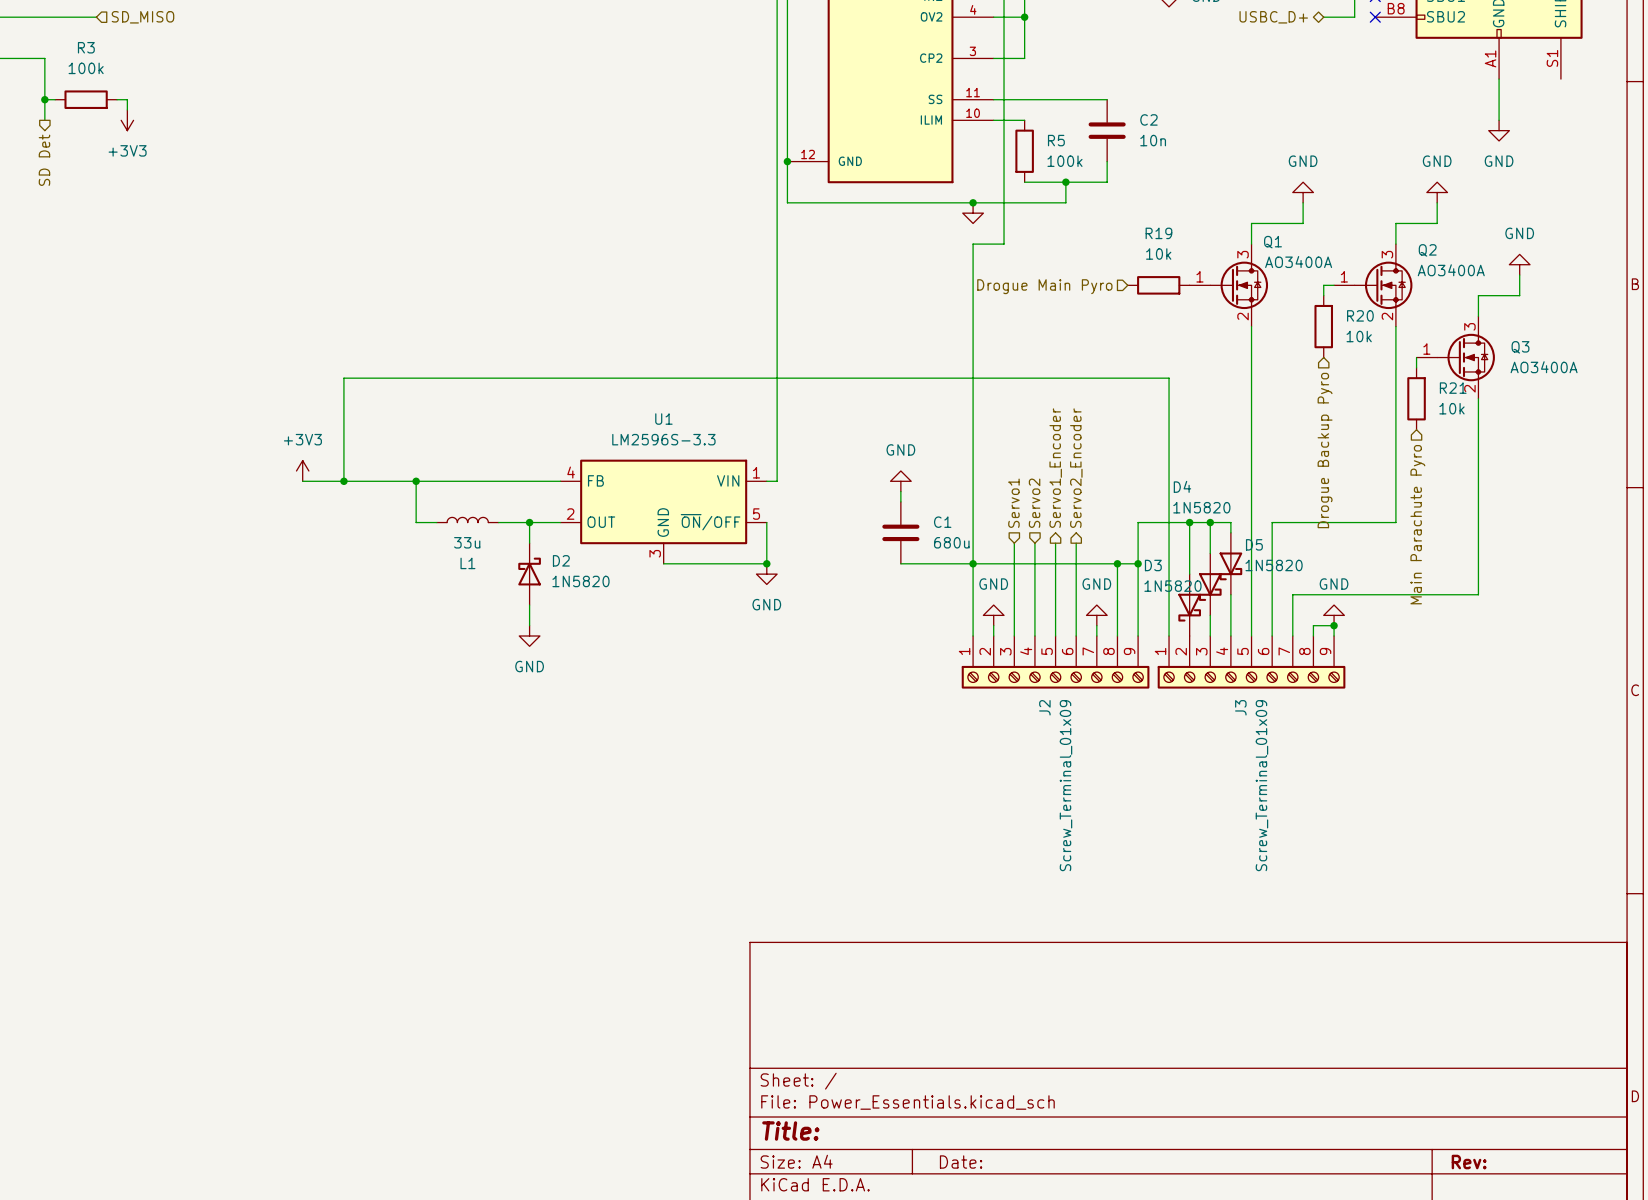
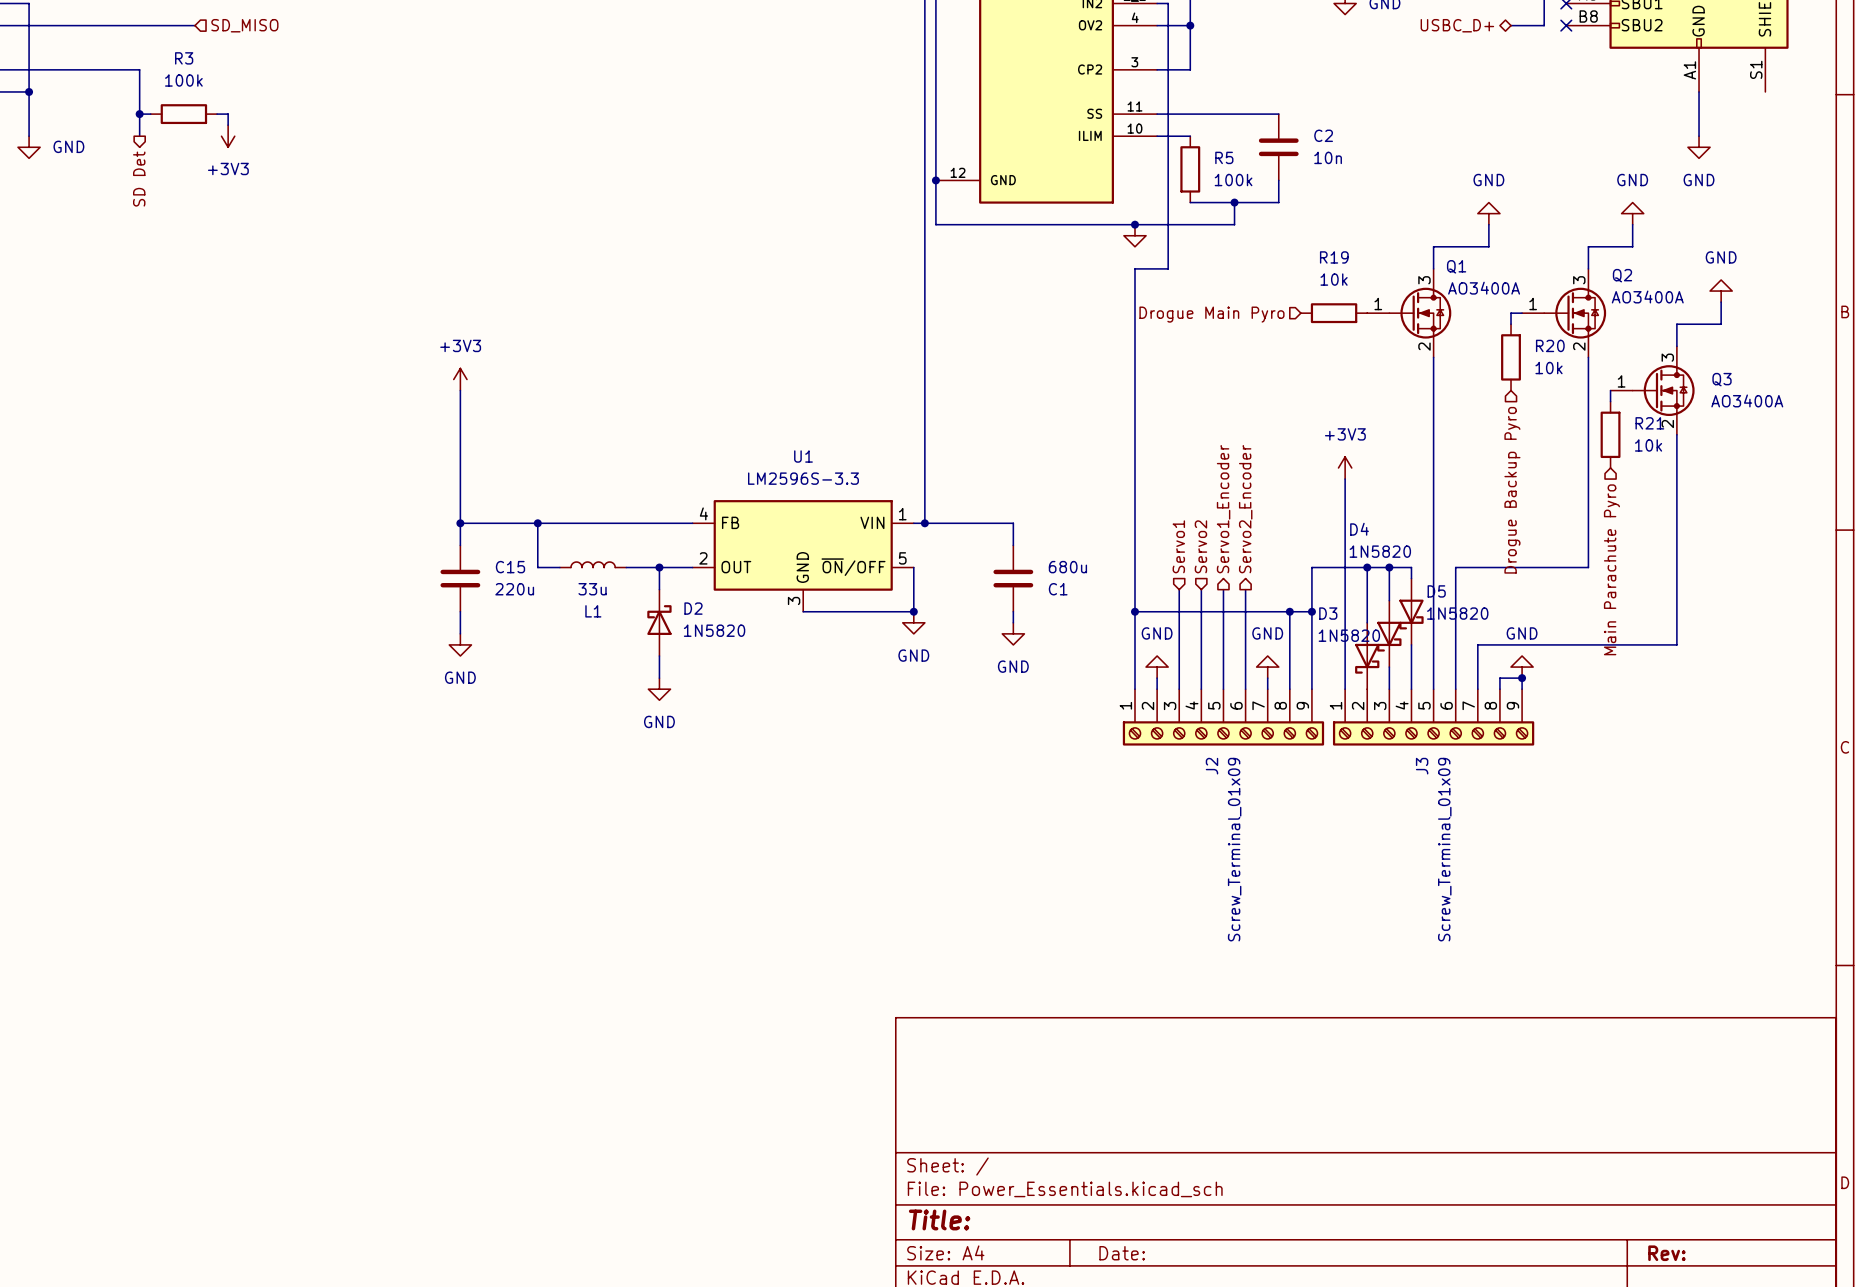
wire: (343, 378) (1169, 378) (1169, 440) -> (460, 412) (460, 390)
power symbol: none -> +3V3 (1345, 467)
power symbol position: +3V3 (302, 470) -> +3V3 (460, 379)
wire: (302, 481) (343, 481) -> (460, 545) (460, 523)
wire: none -> (924, 523) (1013, 523) (1013, 545)
junction: none -> (924, 523)
power symbol rotation: 0° (900, 481) -> 180° (1013, 633)
power symbol position: GND (900, 481) -> GND (1013, 633)
wire: (900, 491) (900, 501) -> (1013, 611) (1013, 622)
C1 name position: C1 (942, 522) -> C1 (1058, 589)
C15: none -> 220u (460, 578)
C1 position: (900, 532) -> (1013, 578)
C1 value position: 680u (951, 542) -> 680u (1067, 567)
wire: none -> (460, 611) (460, 633)
wire: (900, 563) (973, 563) -> none
power symbol: none -> GND (460, 644)

